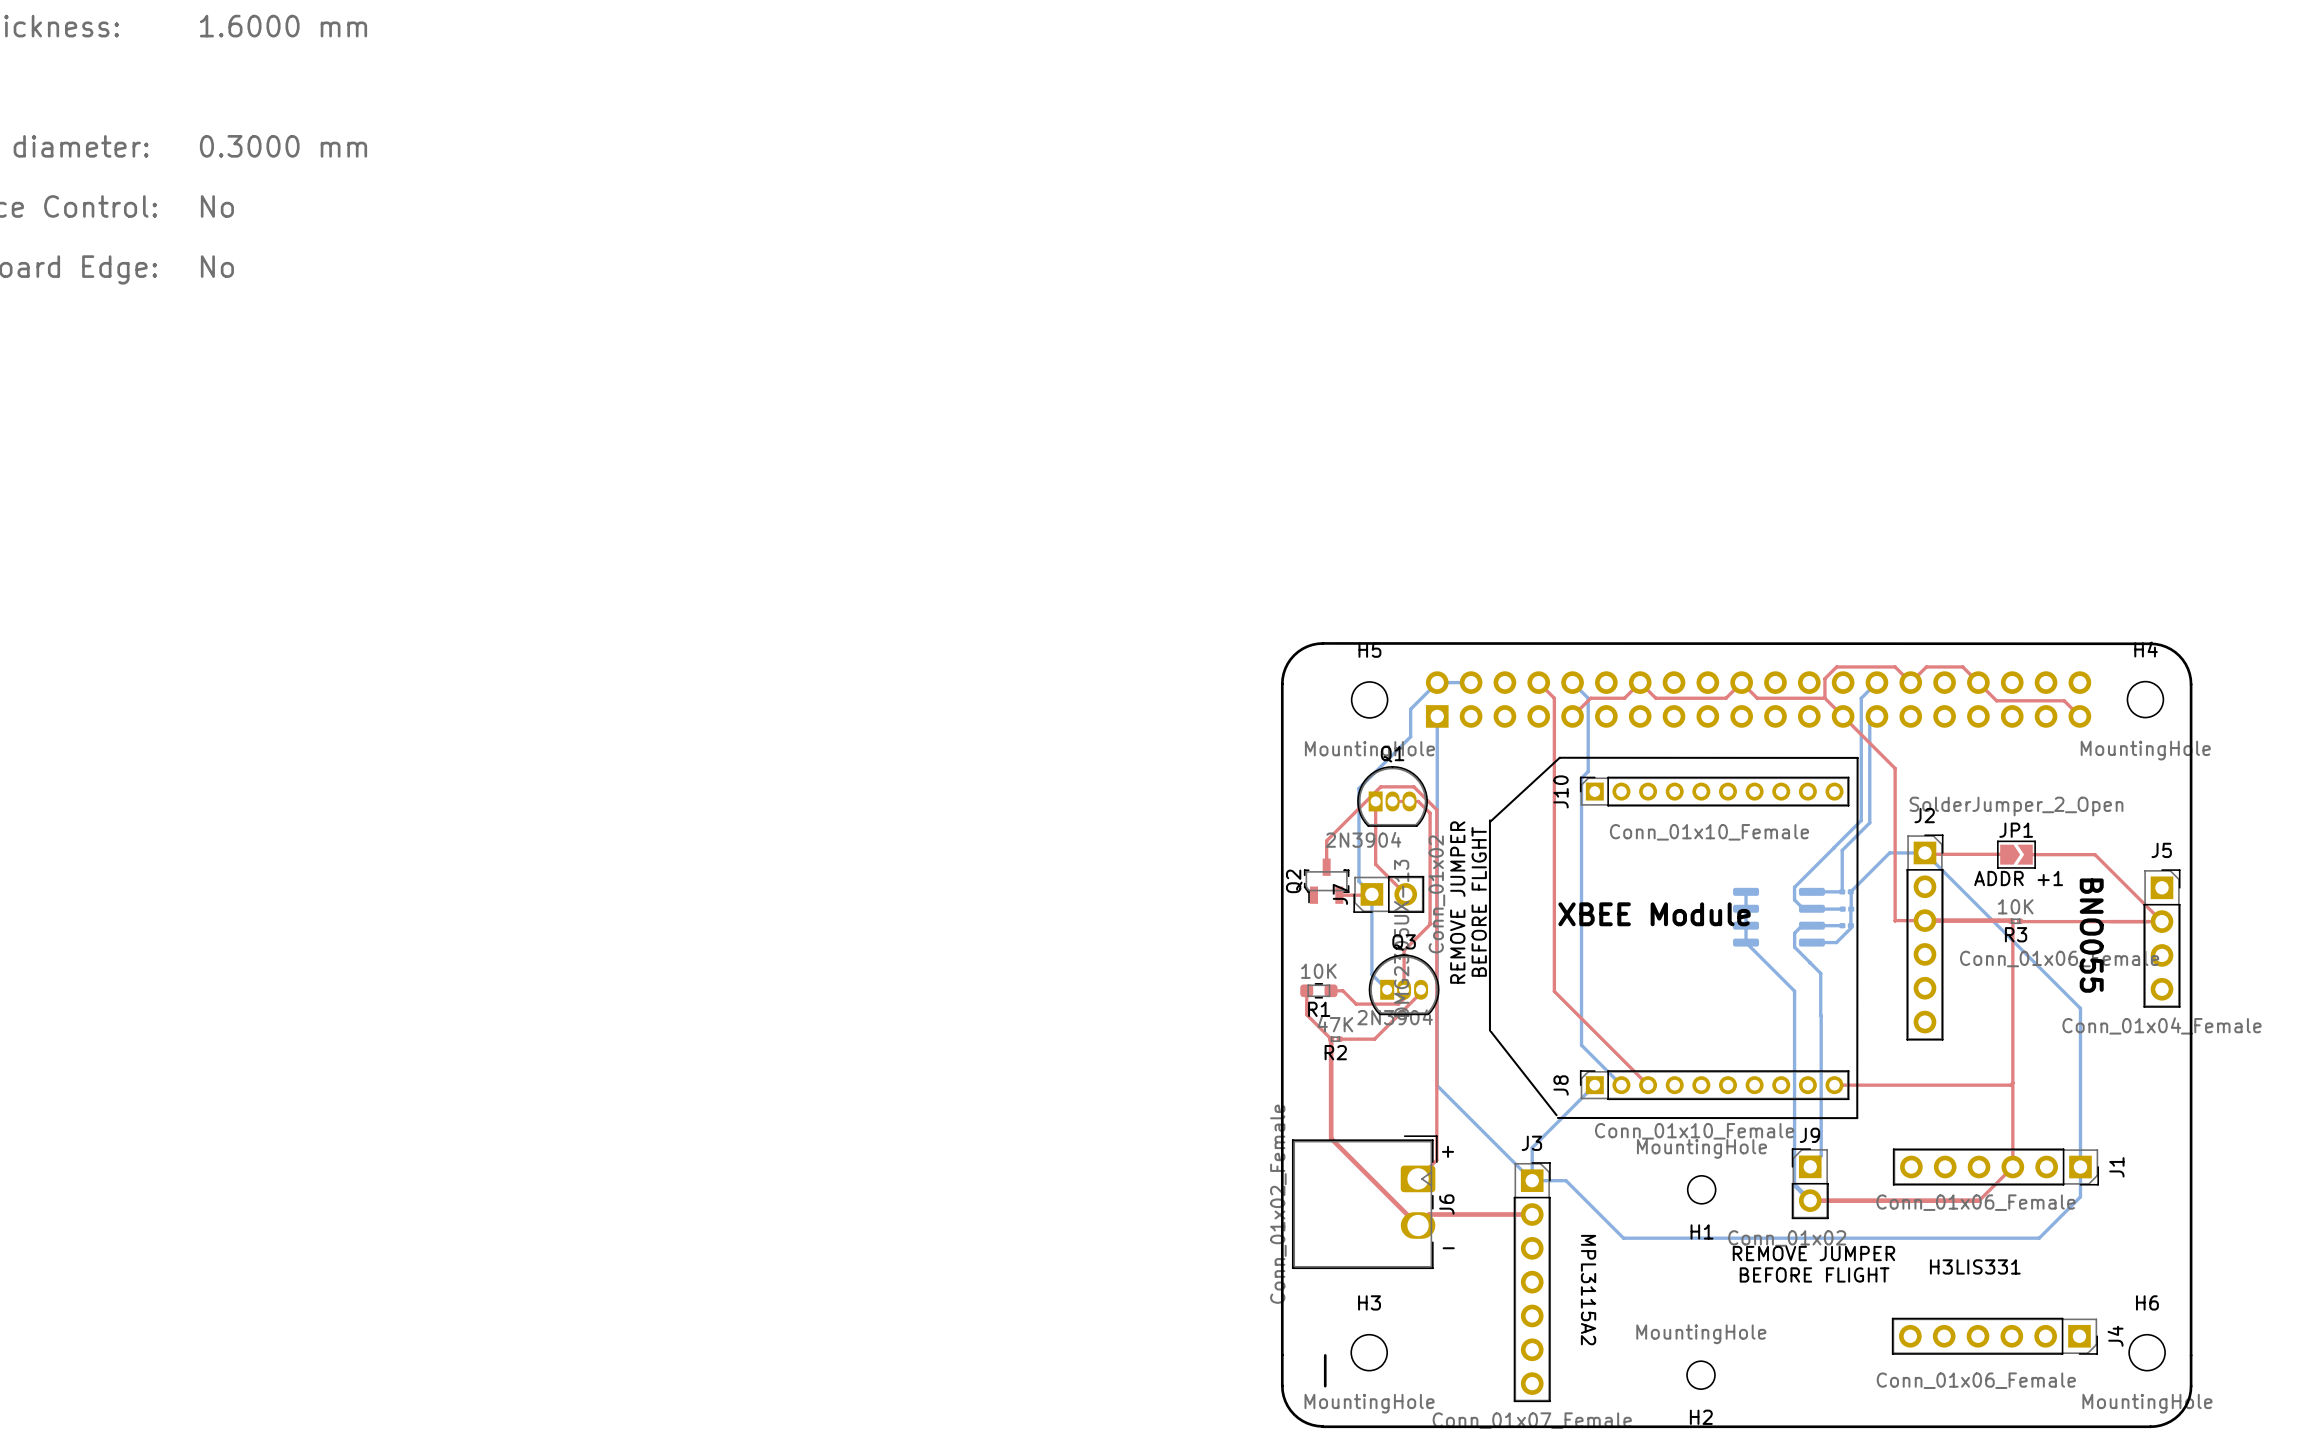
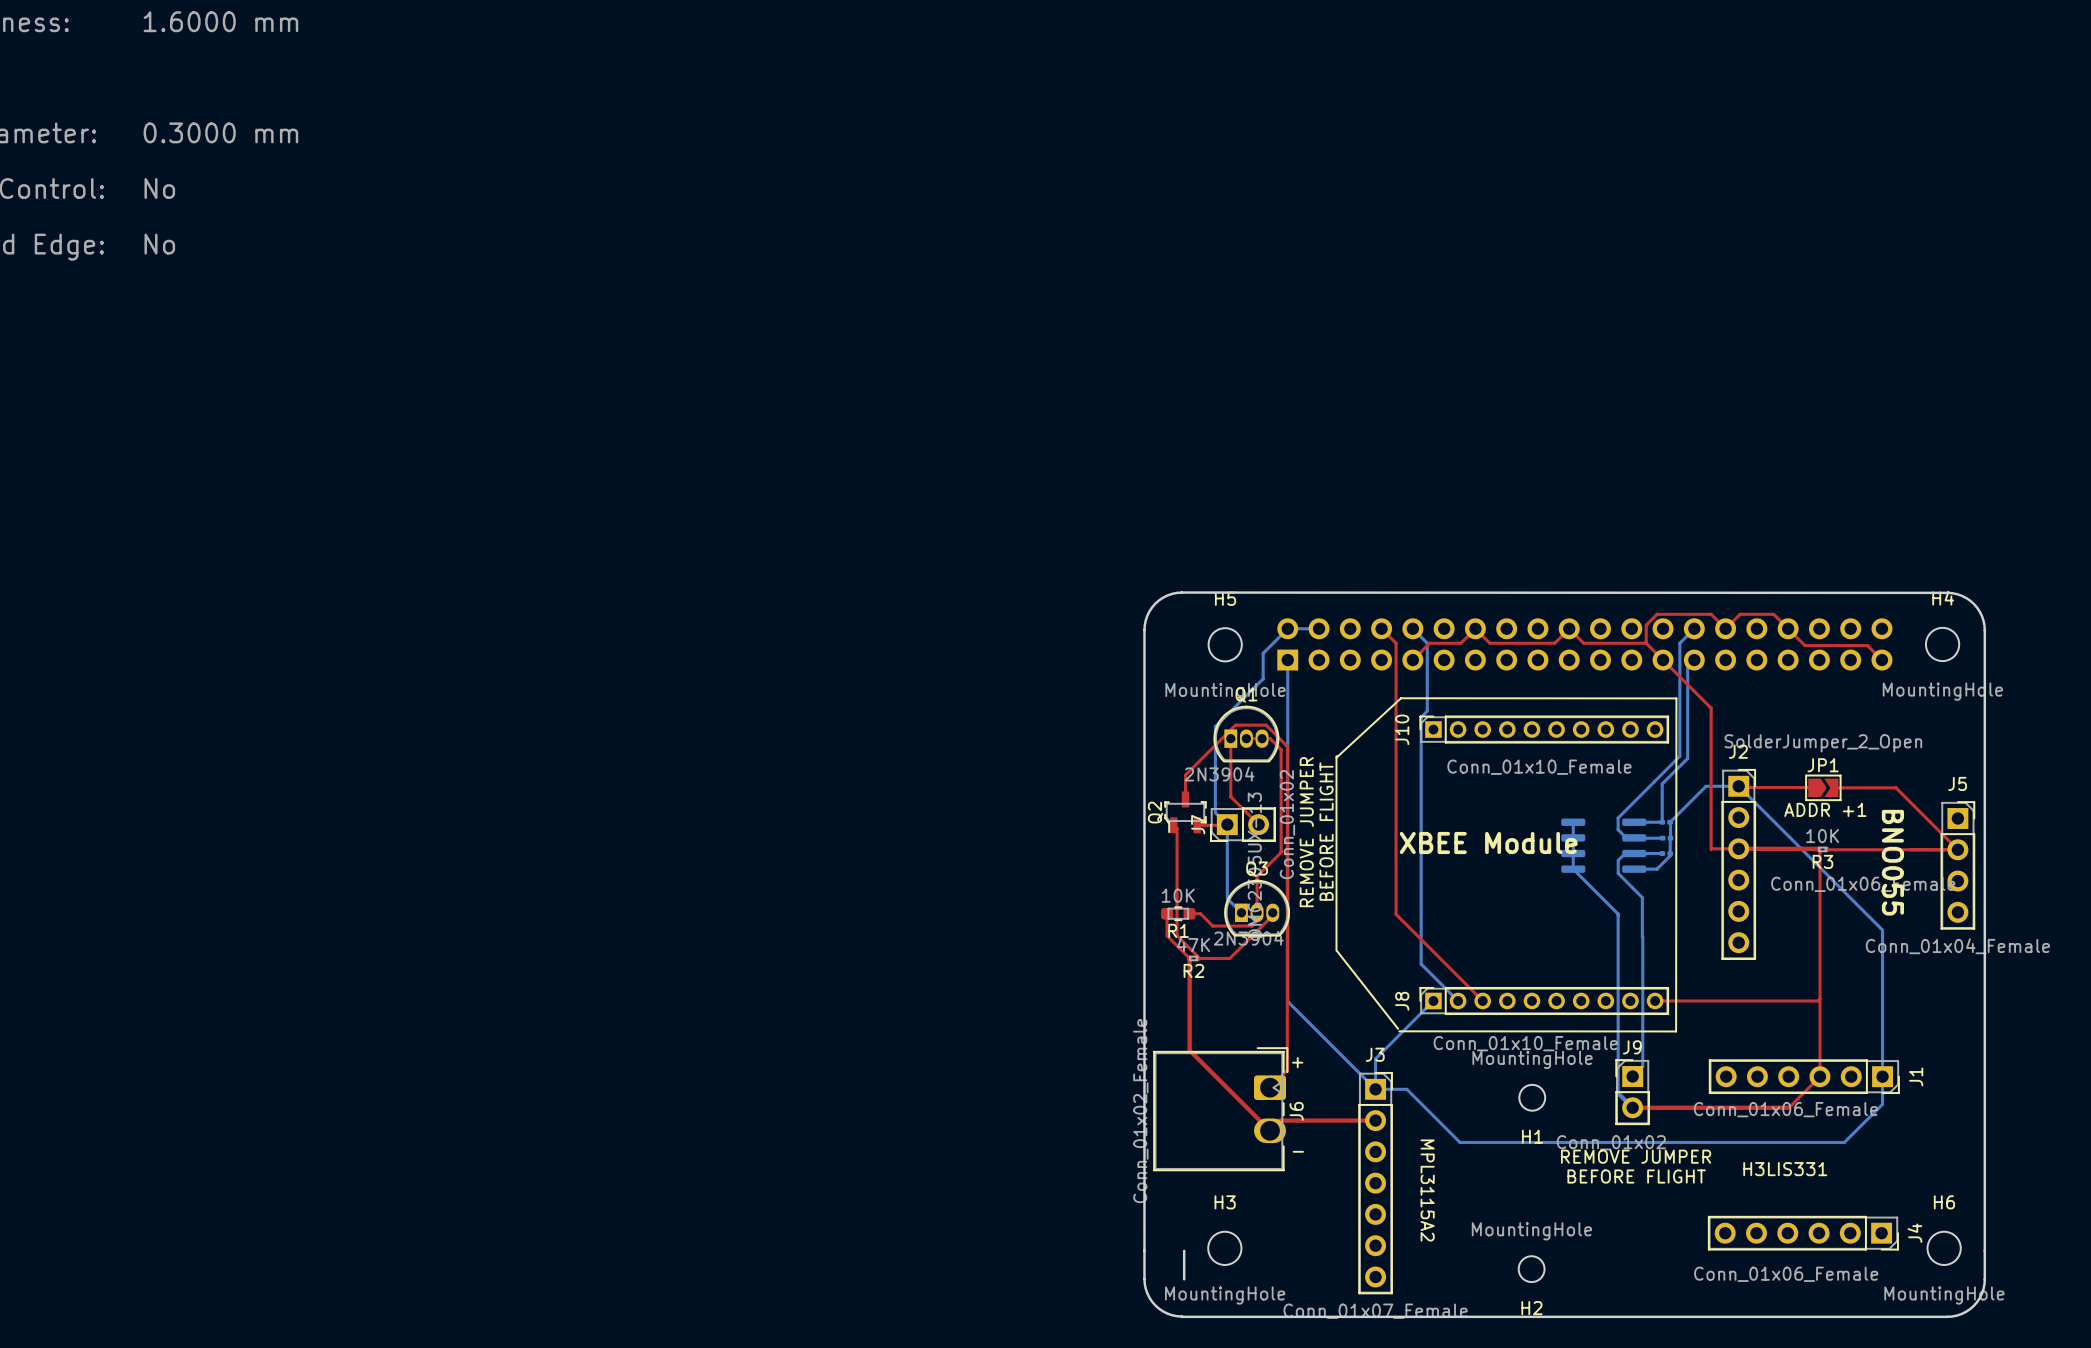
top track: none -> (1173, 825) (1177, 828) (1177, 935) (1197, 956) (1197, 958)

